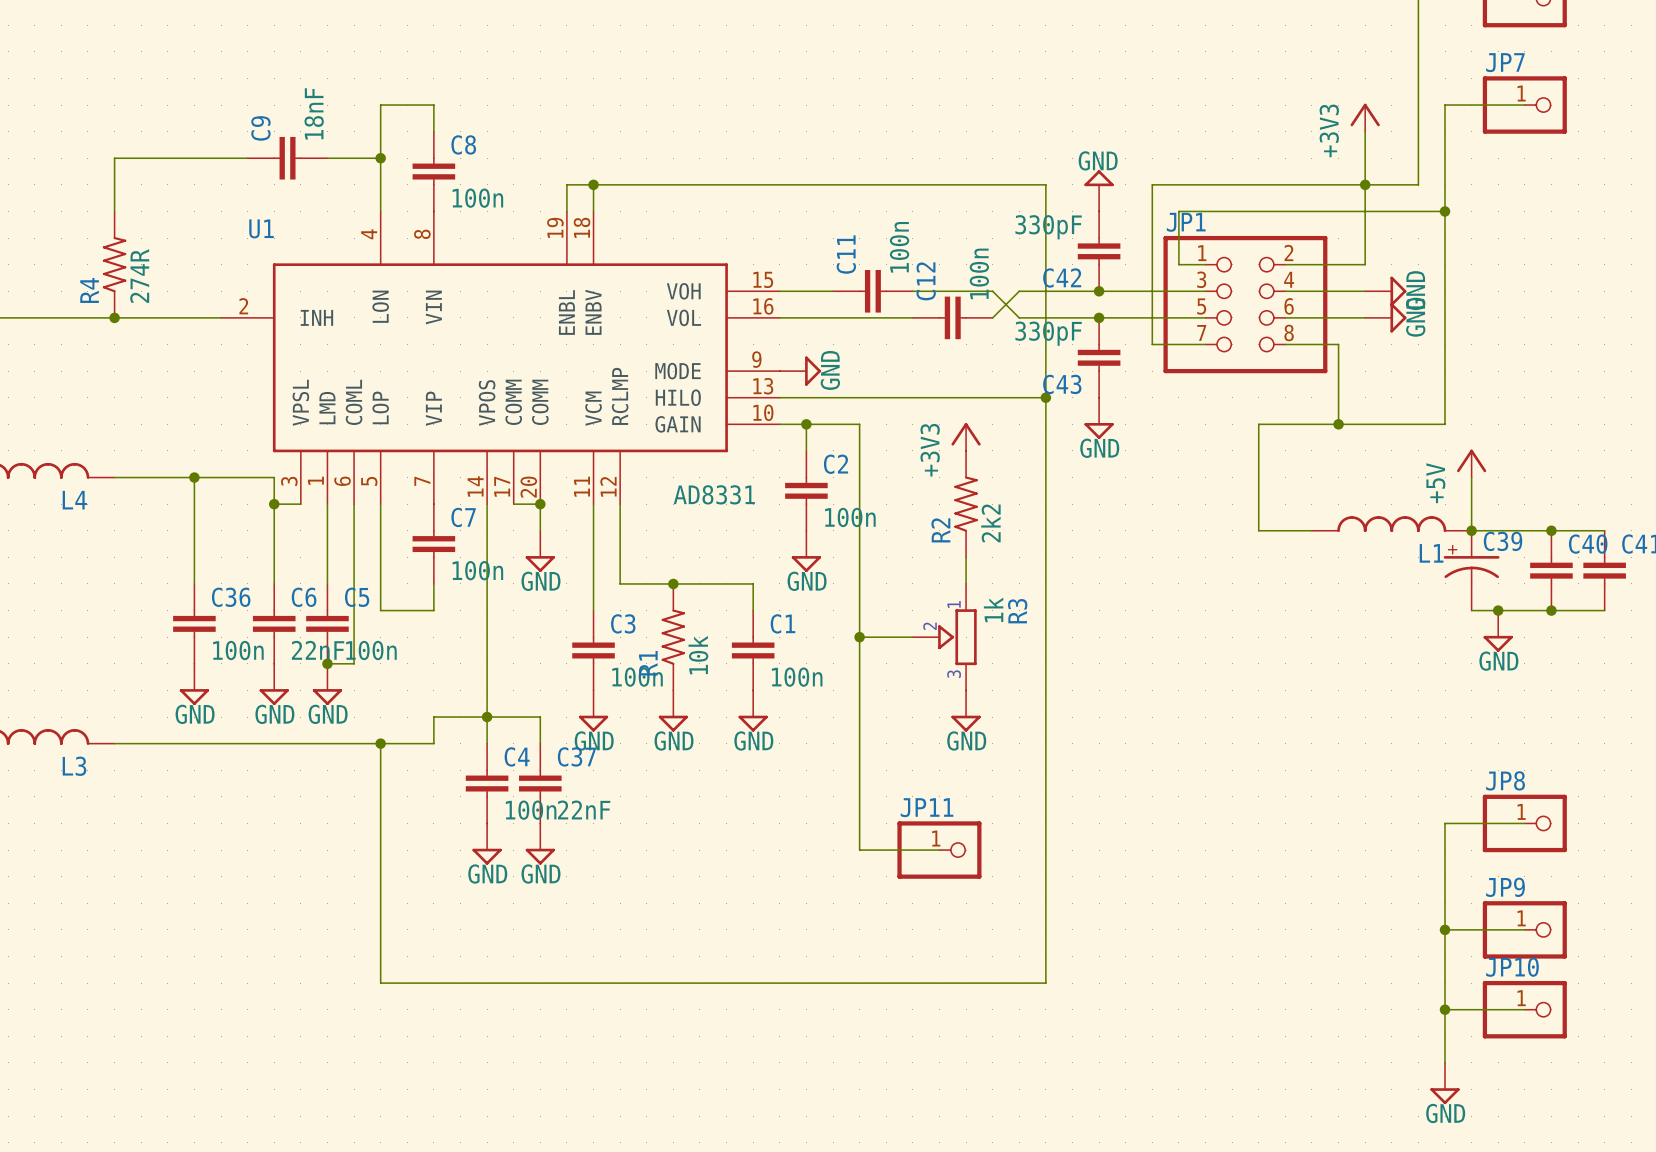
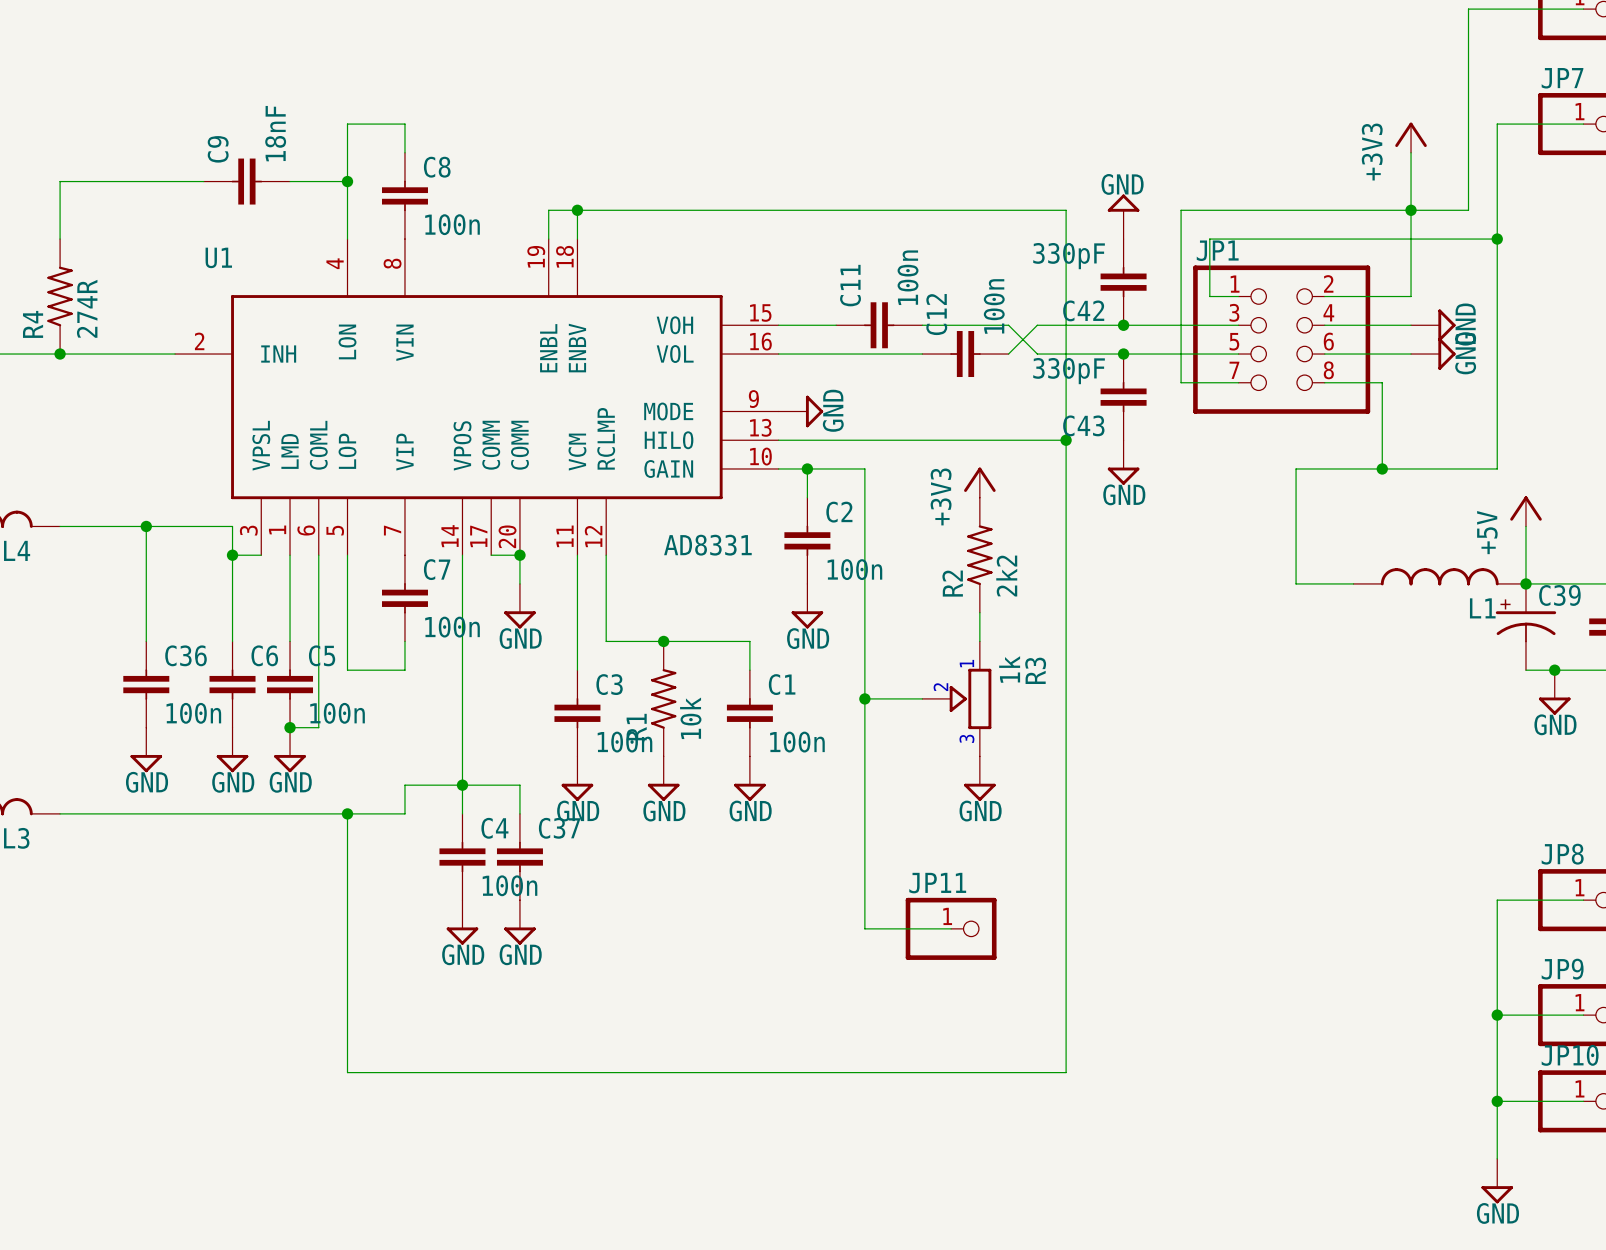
C6 value: 22nF (318, 650) -> none
C37 value: 22nF (584, 809) -> none

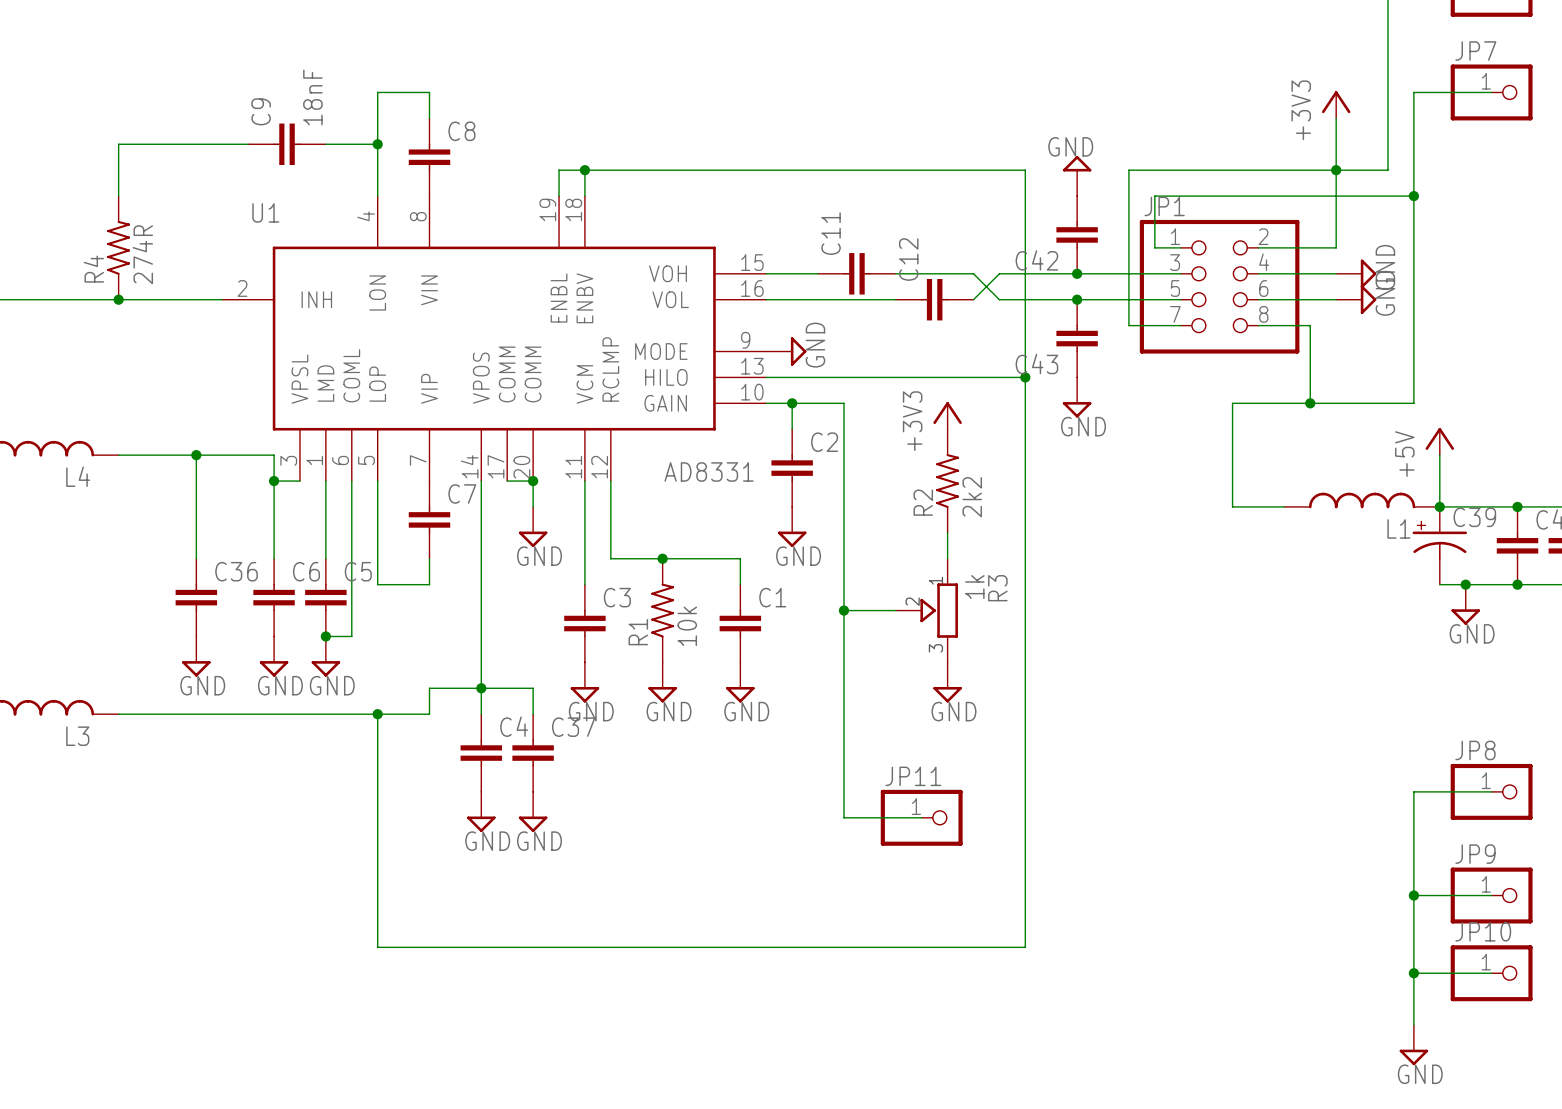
C8 value: 100n (452, 224) -> none
C42 value: 330pF (1069, 256) -> none
C11 value: 100n (908, 277) -> none
C12 value: 100n (994, 306) -> none
C43 value: 330pF (1069, 371) -> none
C2 value: 100n (854, 569) -> none
C7 value: 100n (452, 627) -> none
C36 value: 100n (193, 713) -> none
C5 value: 100n (337, 713) -> none
C3 value: 100n (624, 742) -> none
C1 value: 100n (797, 742) -> none
C4 value: 100n (510, 885) -> none

